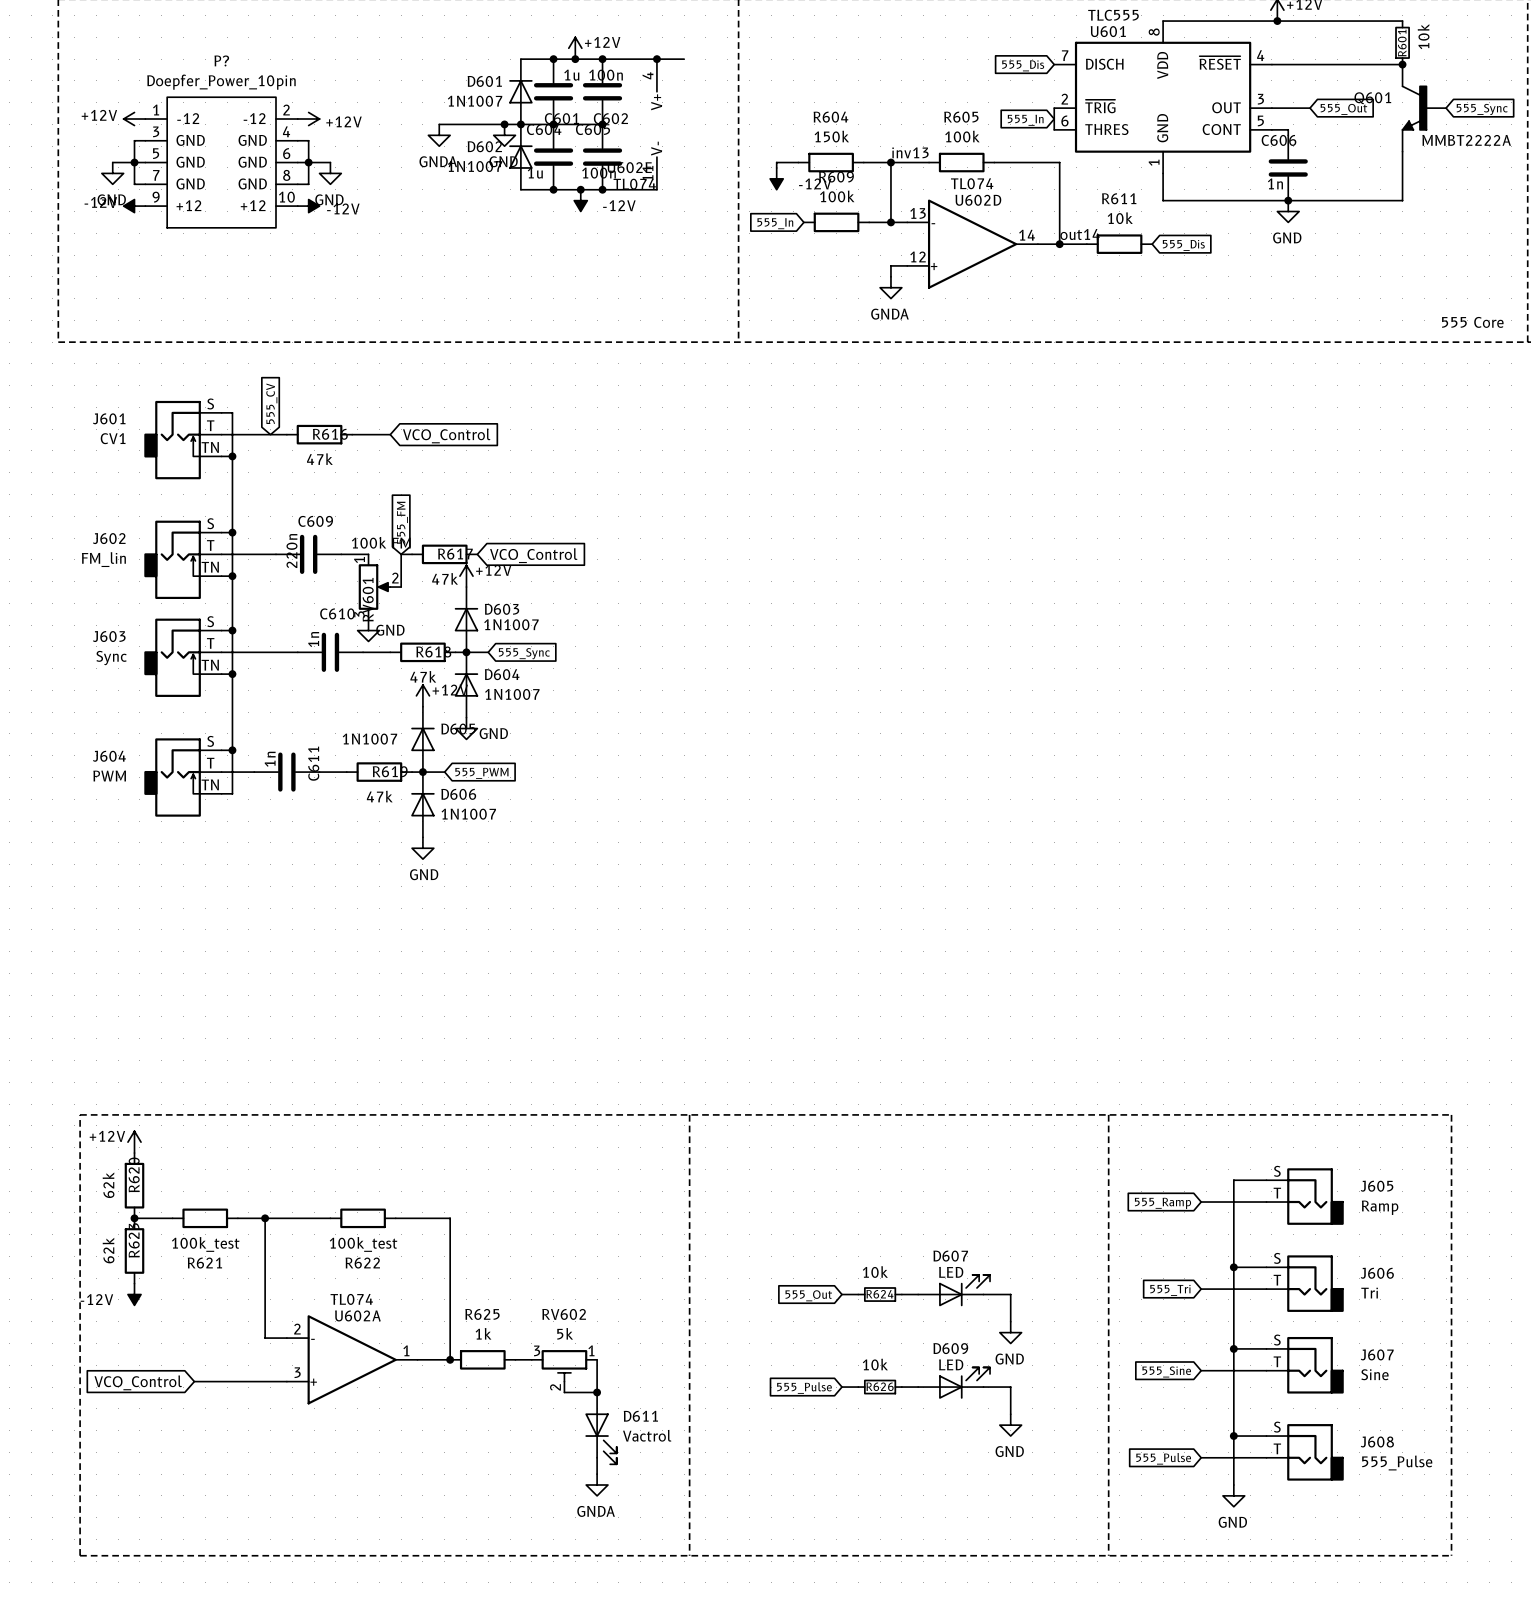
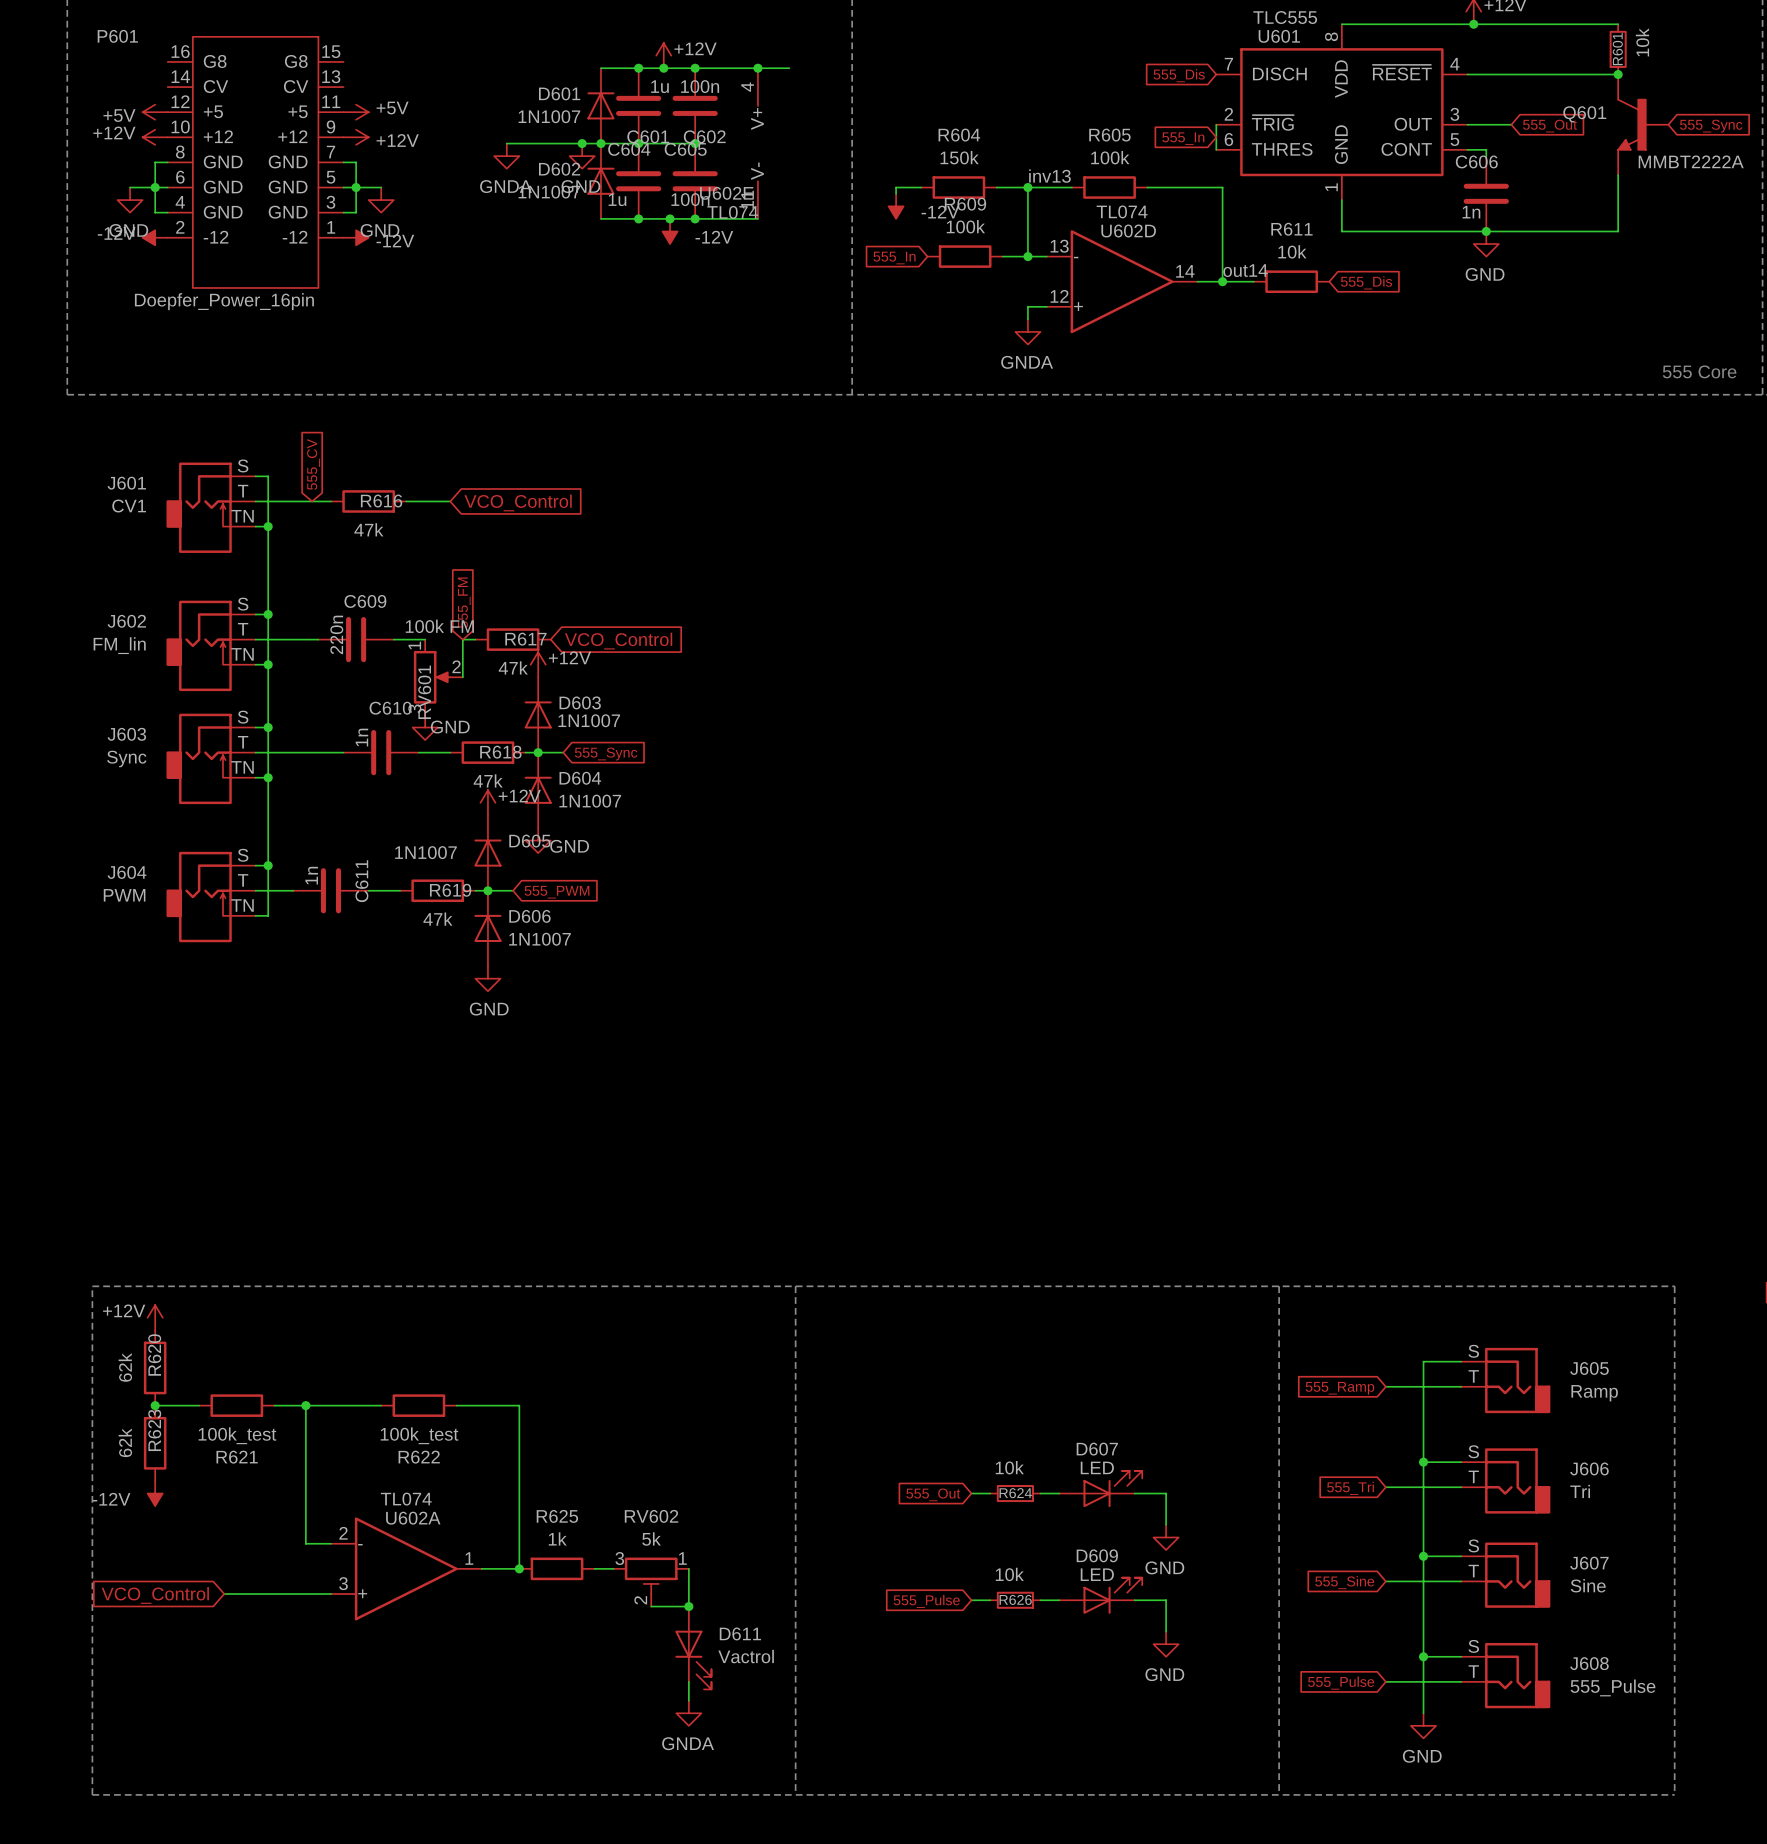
power symbol: none -> +5V (155, 112)
power symbol: none -> +5V (356, 112)
P601: none -> Doepfer_Power_16pin (255, 162)
P?: Doepfer_Power_10pin (221, 162) -> none

